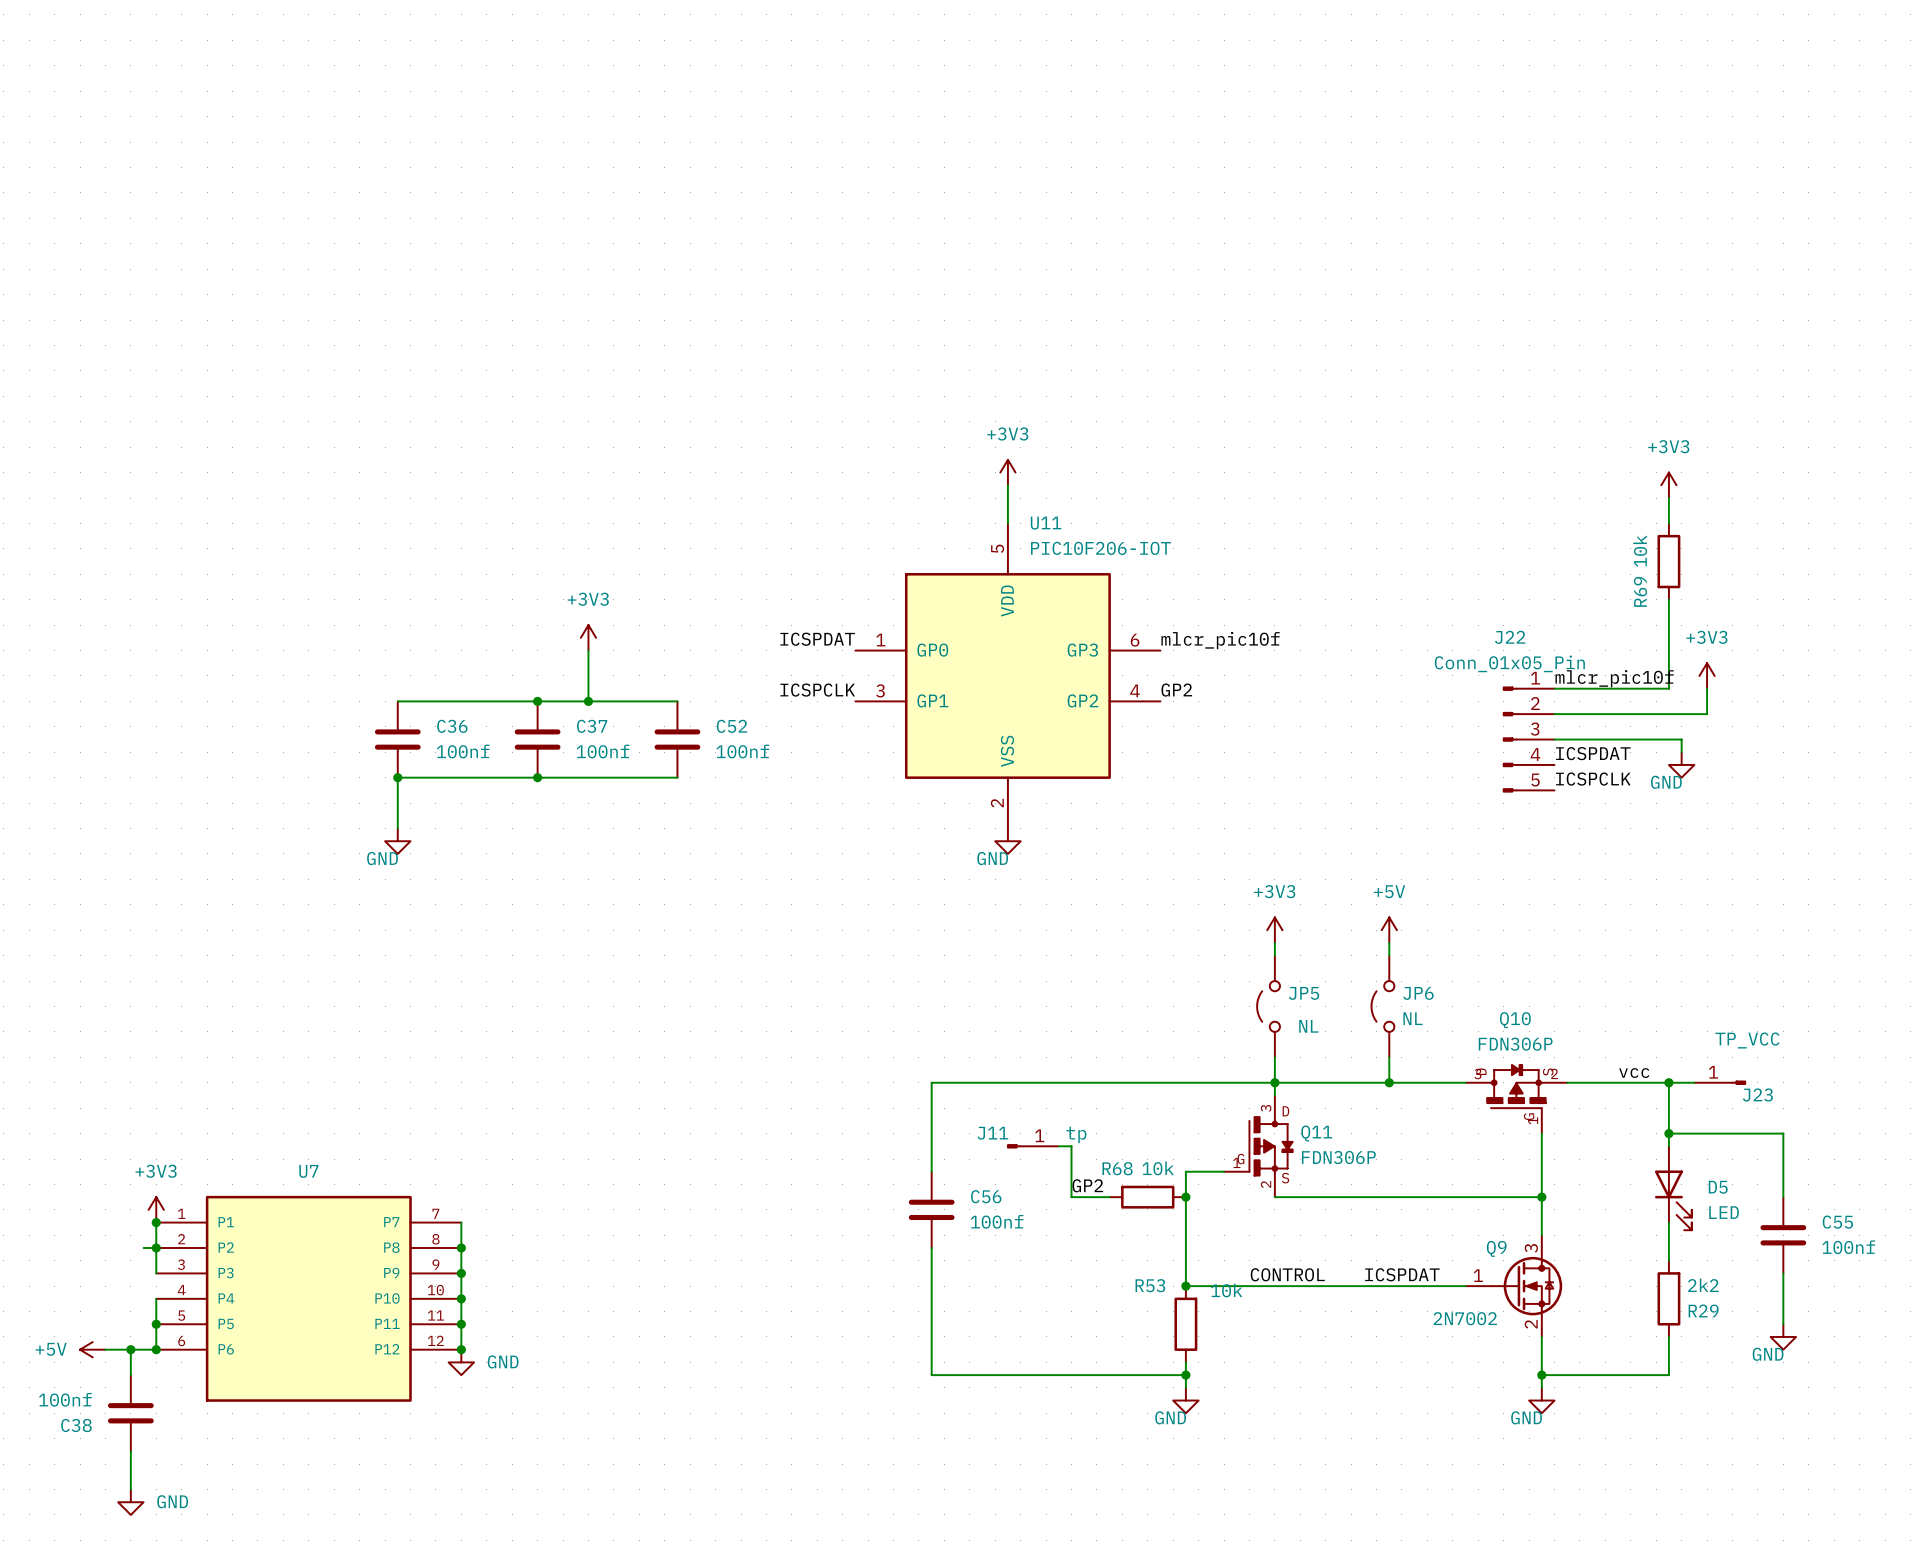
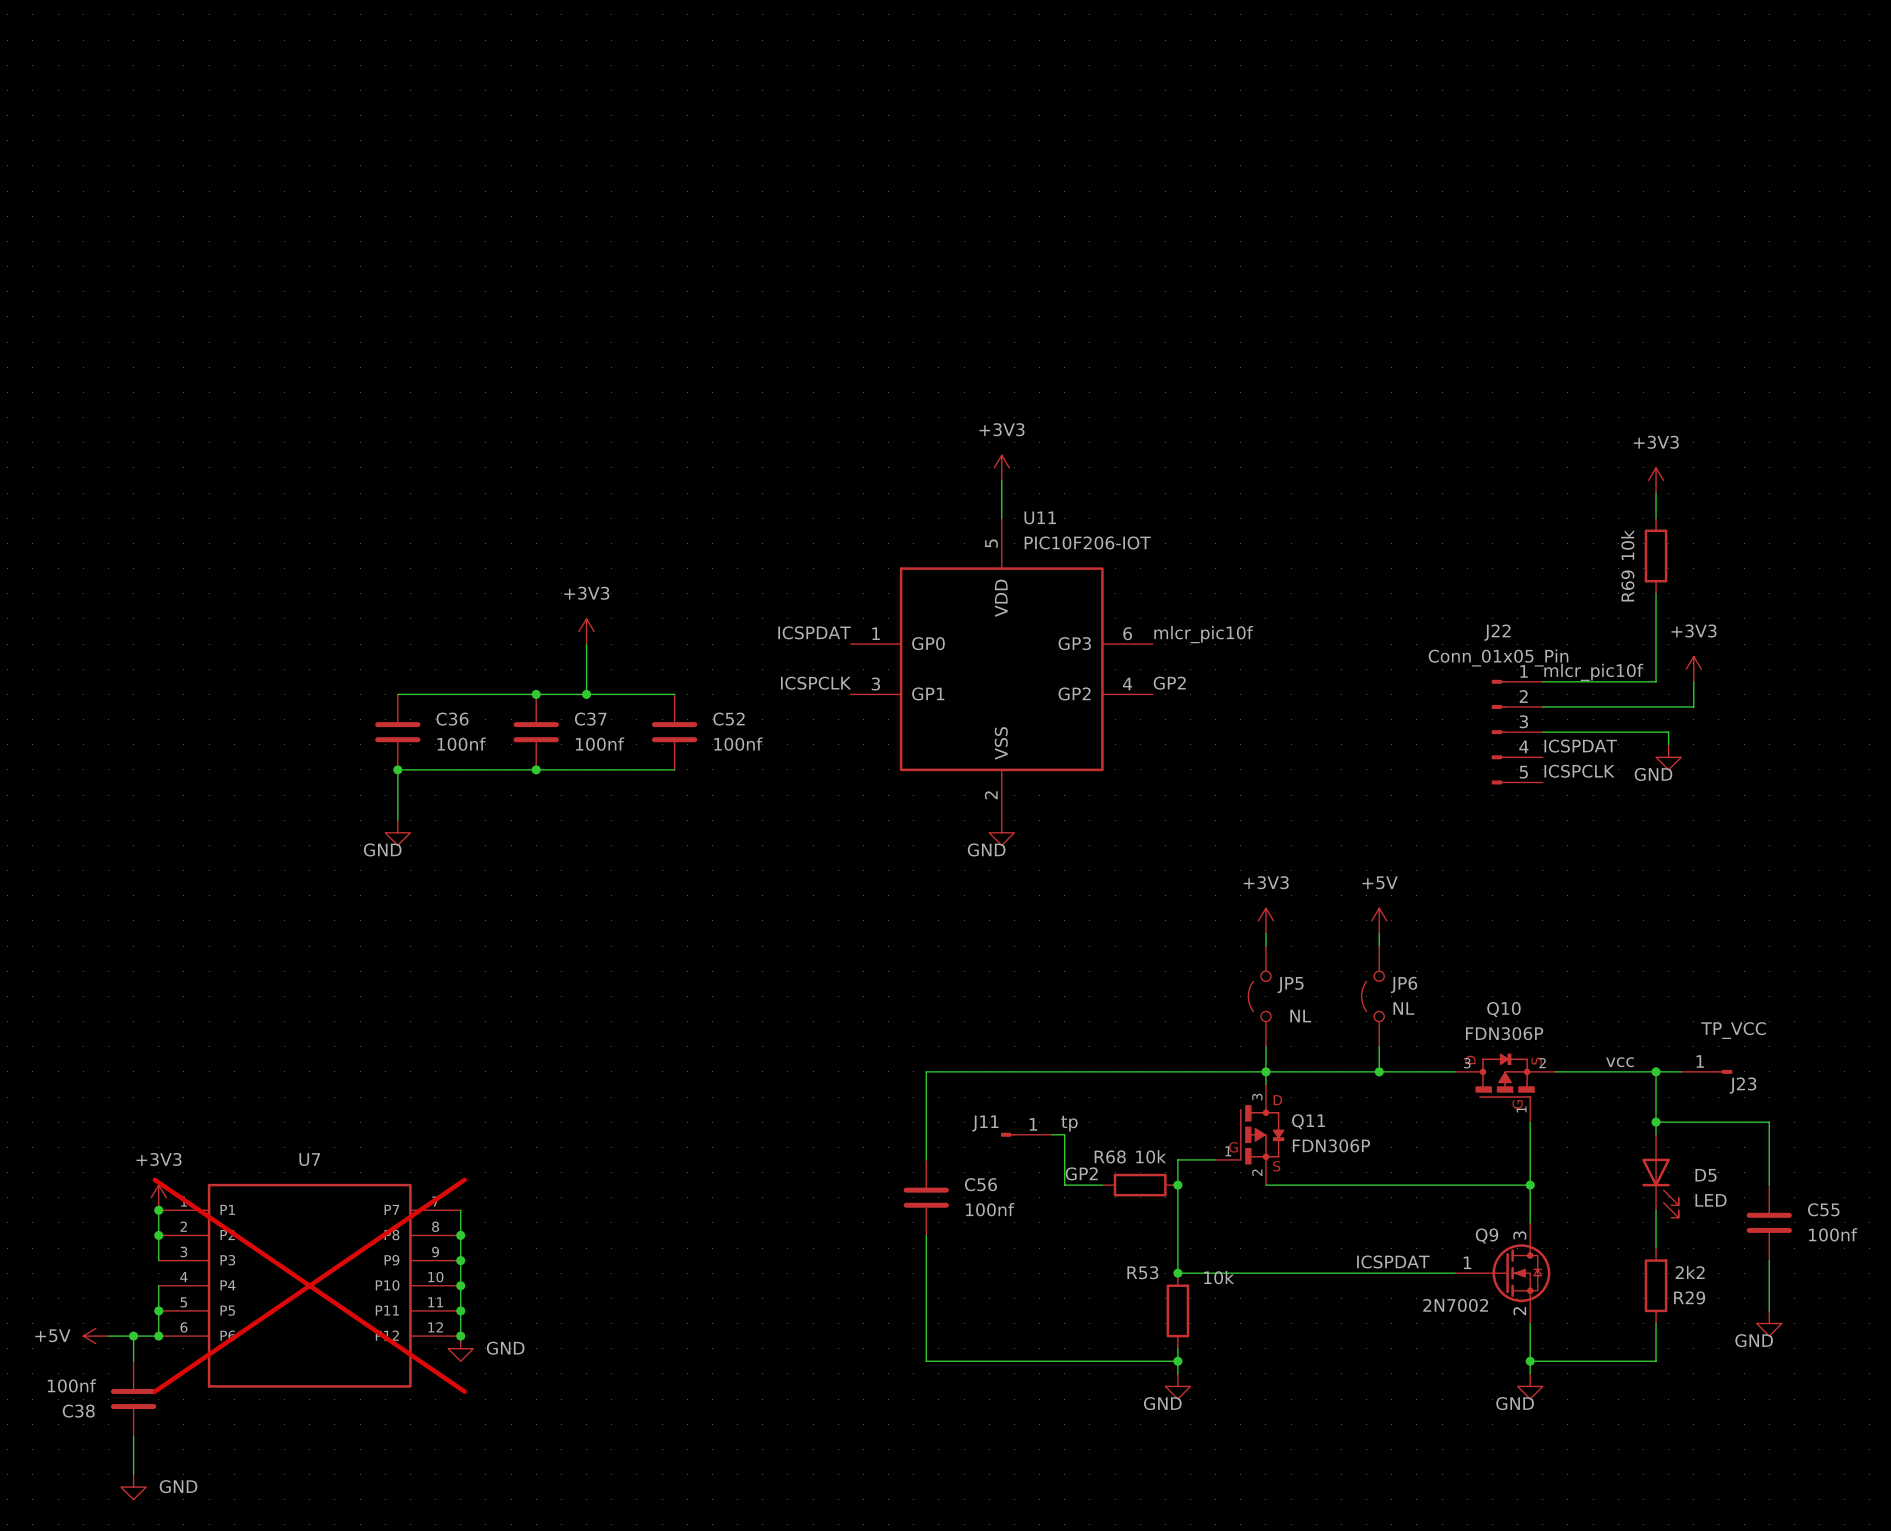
wire: (143, 1248) (156, 1248) -> none
label: CONTROL (1287, 1274) -> none
U7 do-not-place cross: none -> (309, 1285)

